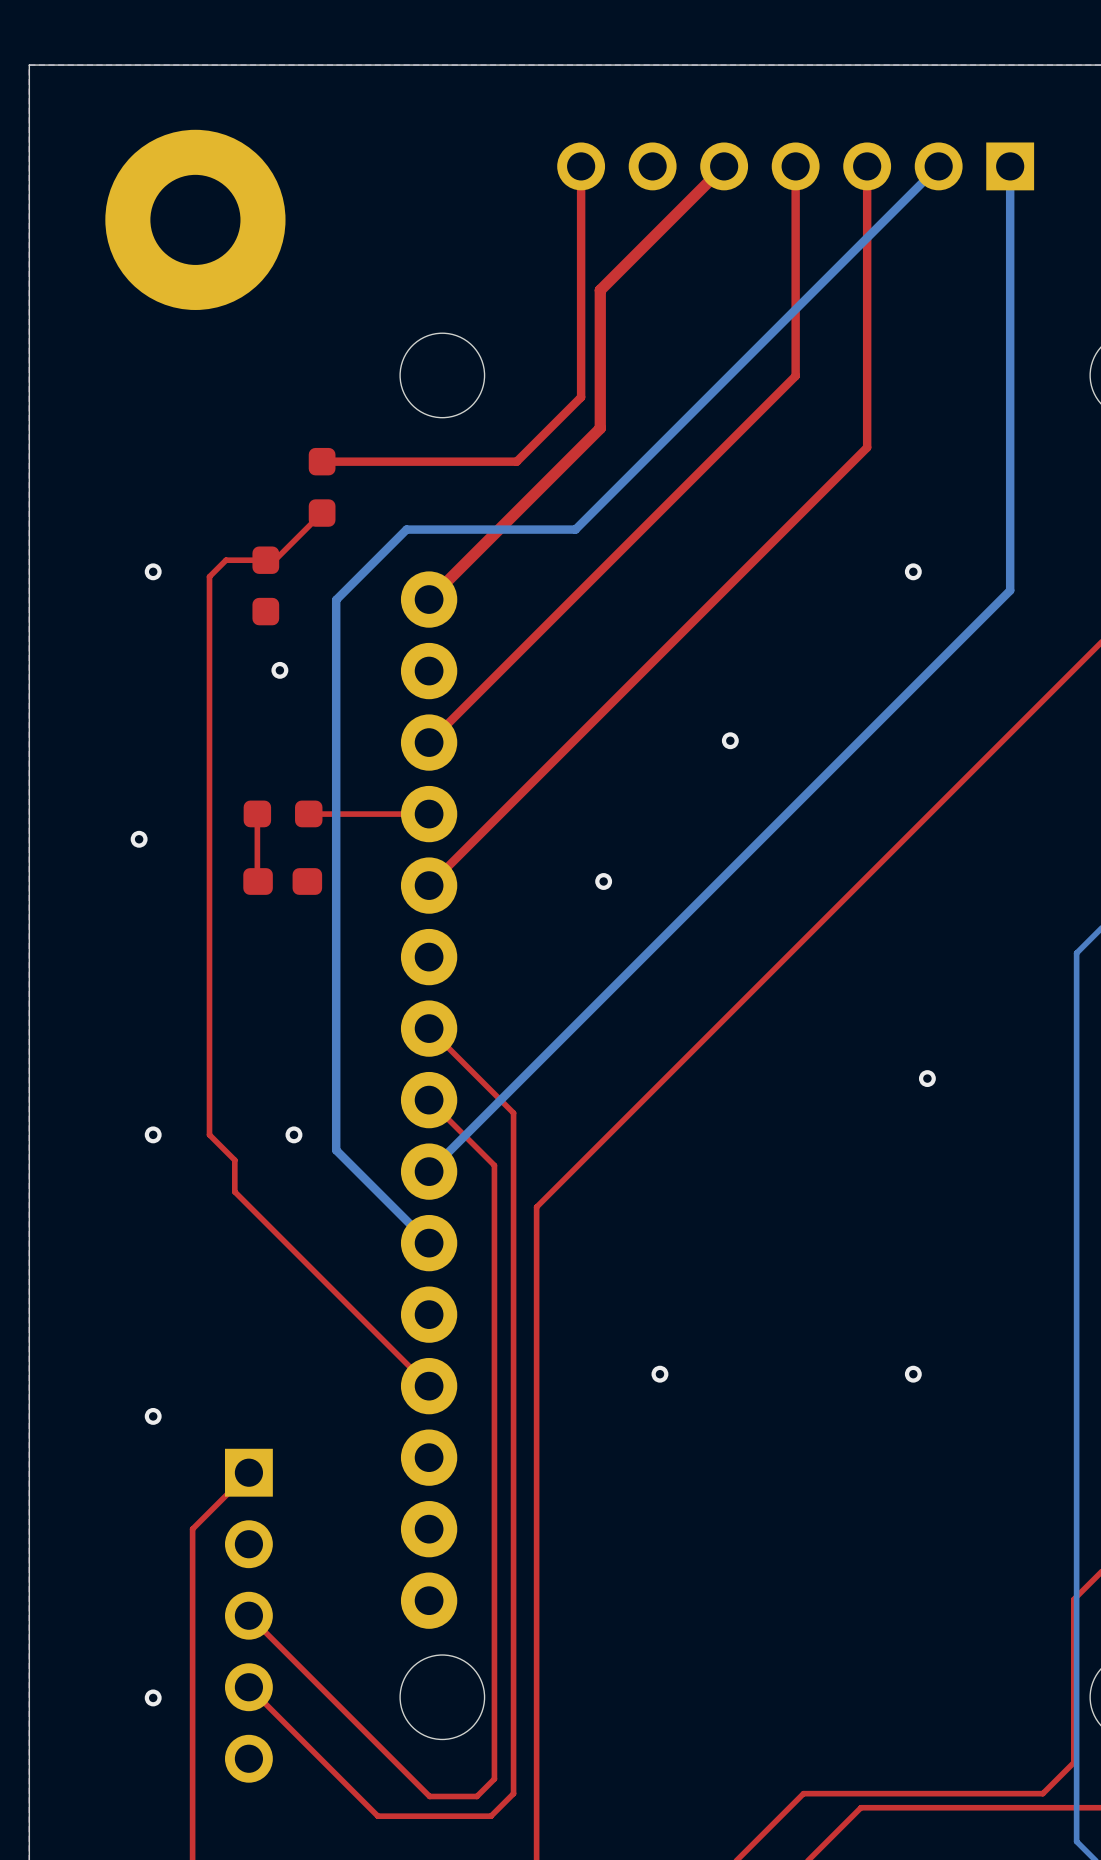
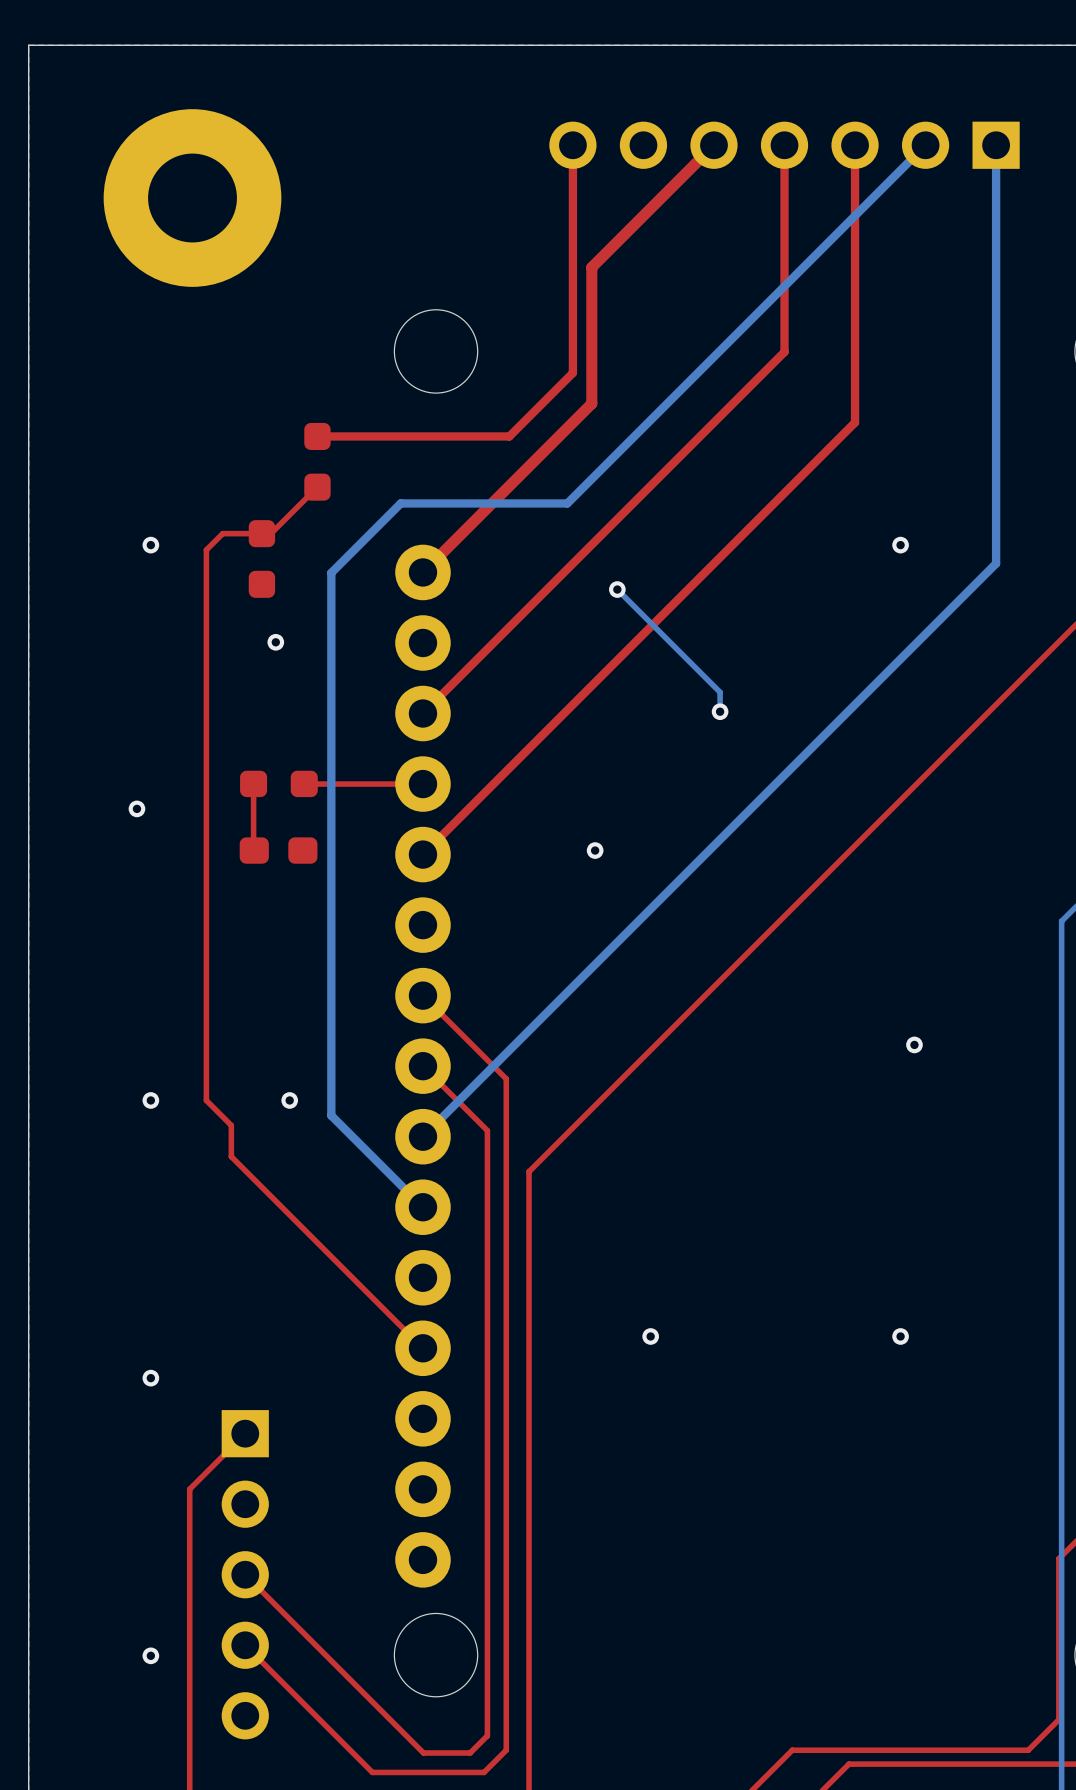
bottom track: none -> (617, 589) (720, 692) (720, 711)
via: none -> (617, 589)

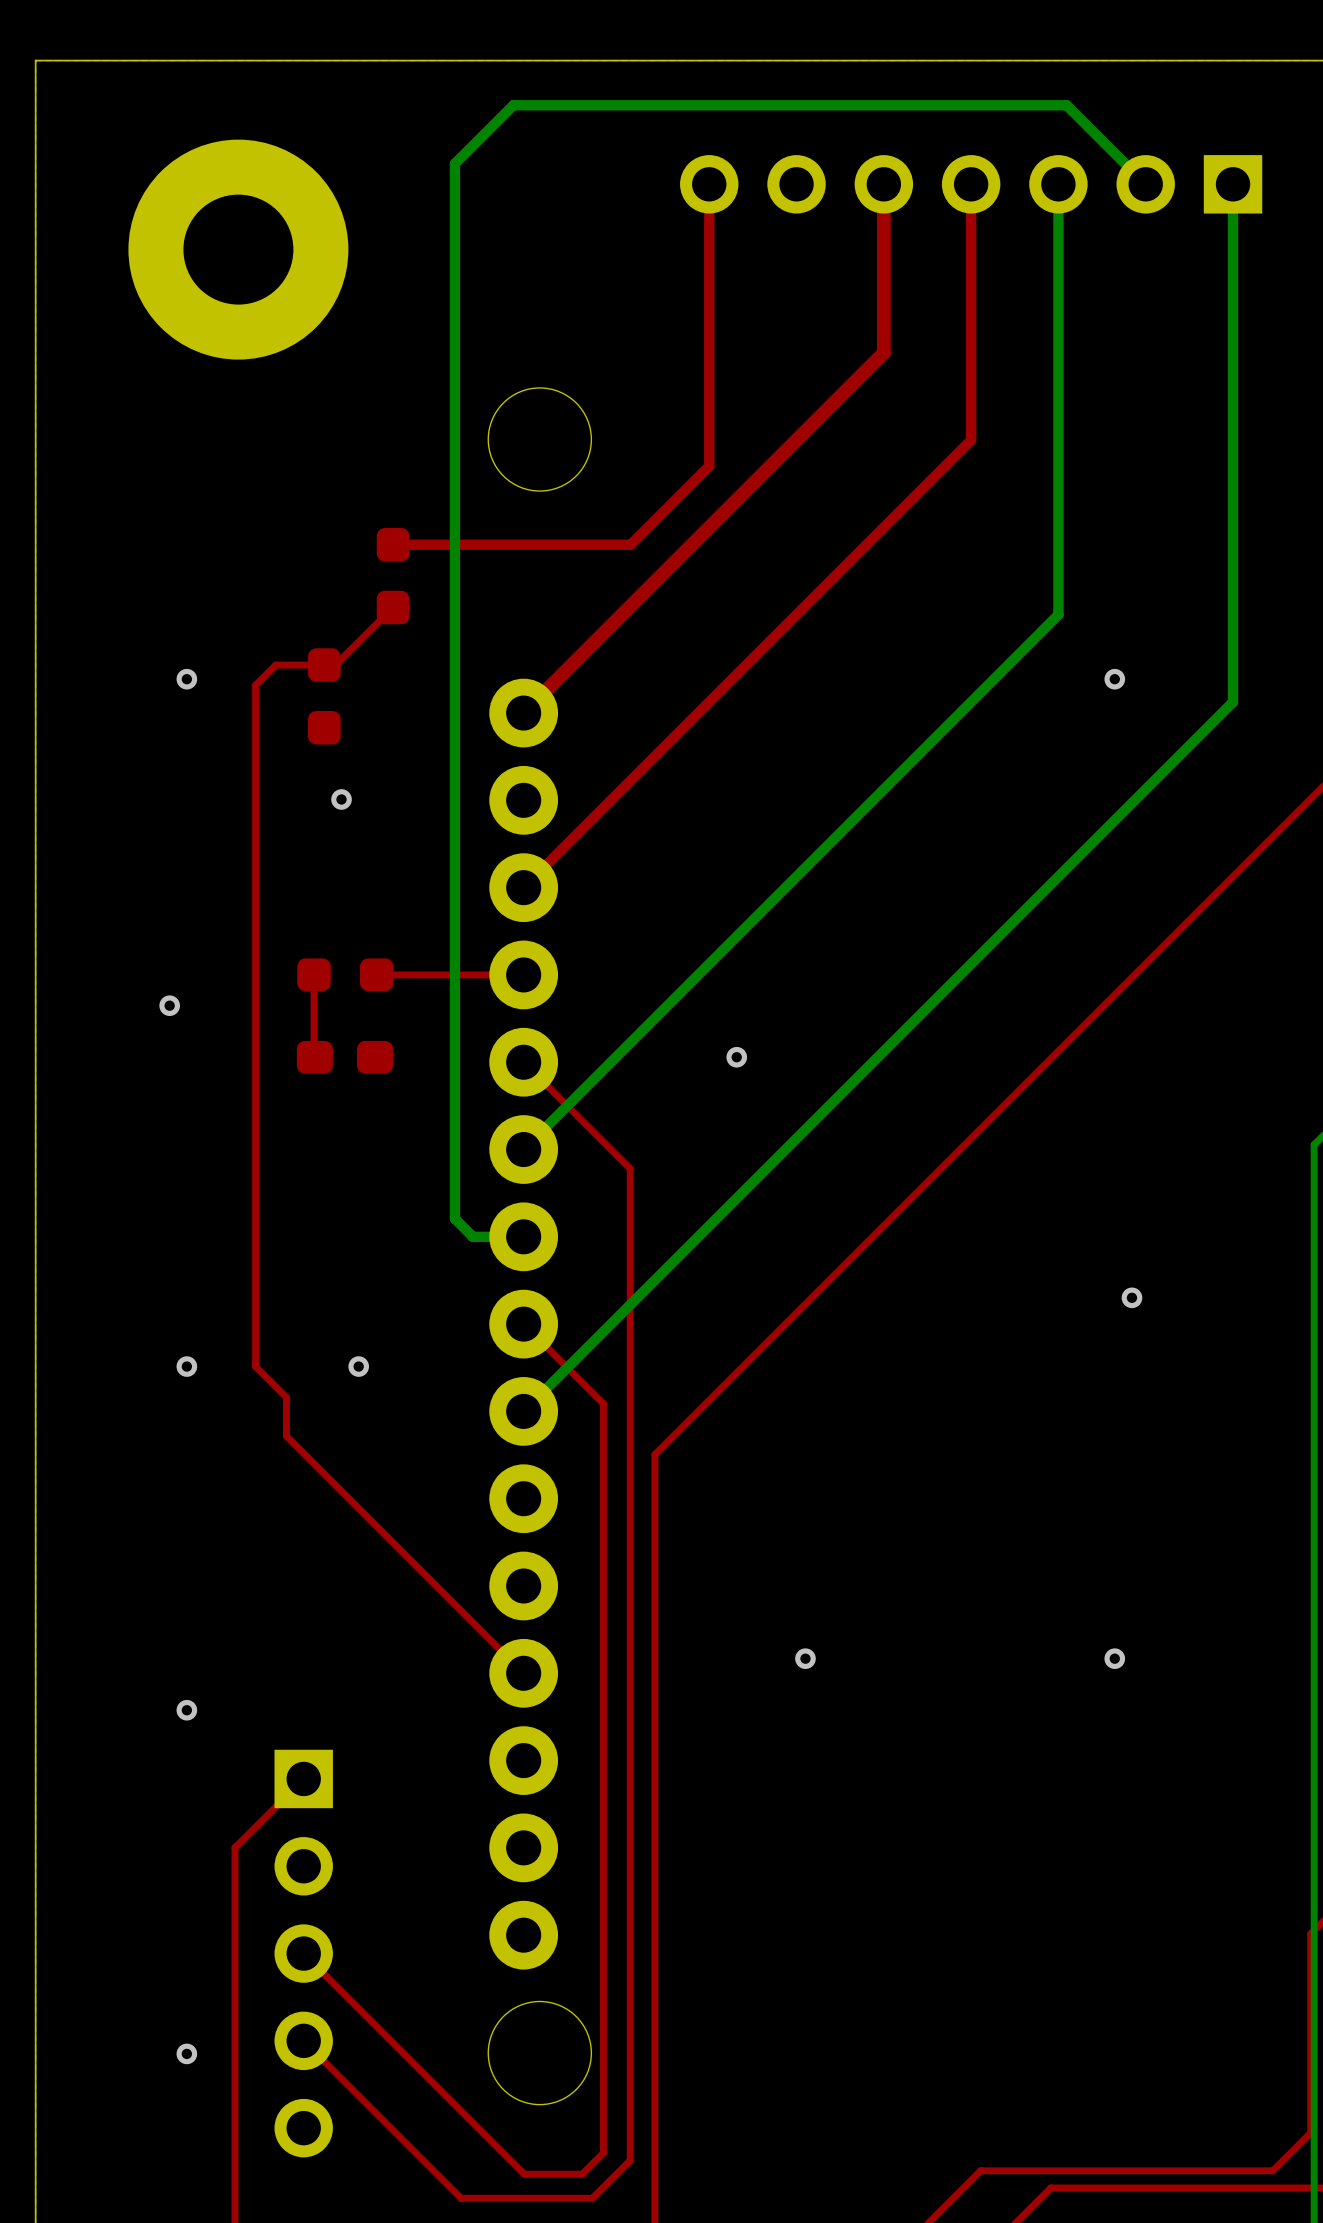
top track: (713, 145) (591, 267) (591, 403) -> (883, 184) (883, 352) (732, 504)
bottom track: none -> (1058, 184) (1058, 614) (523, 1149)
top track: (855, 145) (855, 422) (422, 854) -> none
bottom track: (925, 145) (567, 503) (400, 503) (331, 572) (331, 1115) (422, 1207) -> (1145, 184) (1066, 105) (513, 105) (454, 163) (454, 1218) (472, 1236) (523, 1236)
bottom track: (617, 589) (720, 692) (720, 711) -> none
via: (617, 589) -> none
via: (720, 711) -> none
top track: (422, 995) (506, 1078) (506, 1750) (484, 1772) (478, 1772) -> (523, 1062) (630, 1168) (630, 2160) (592, 2198)

